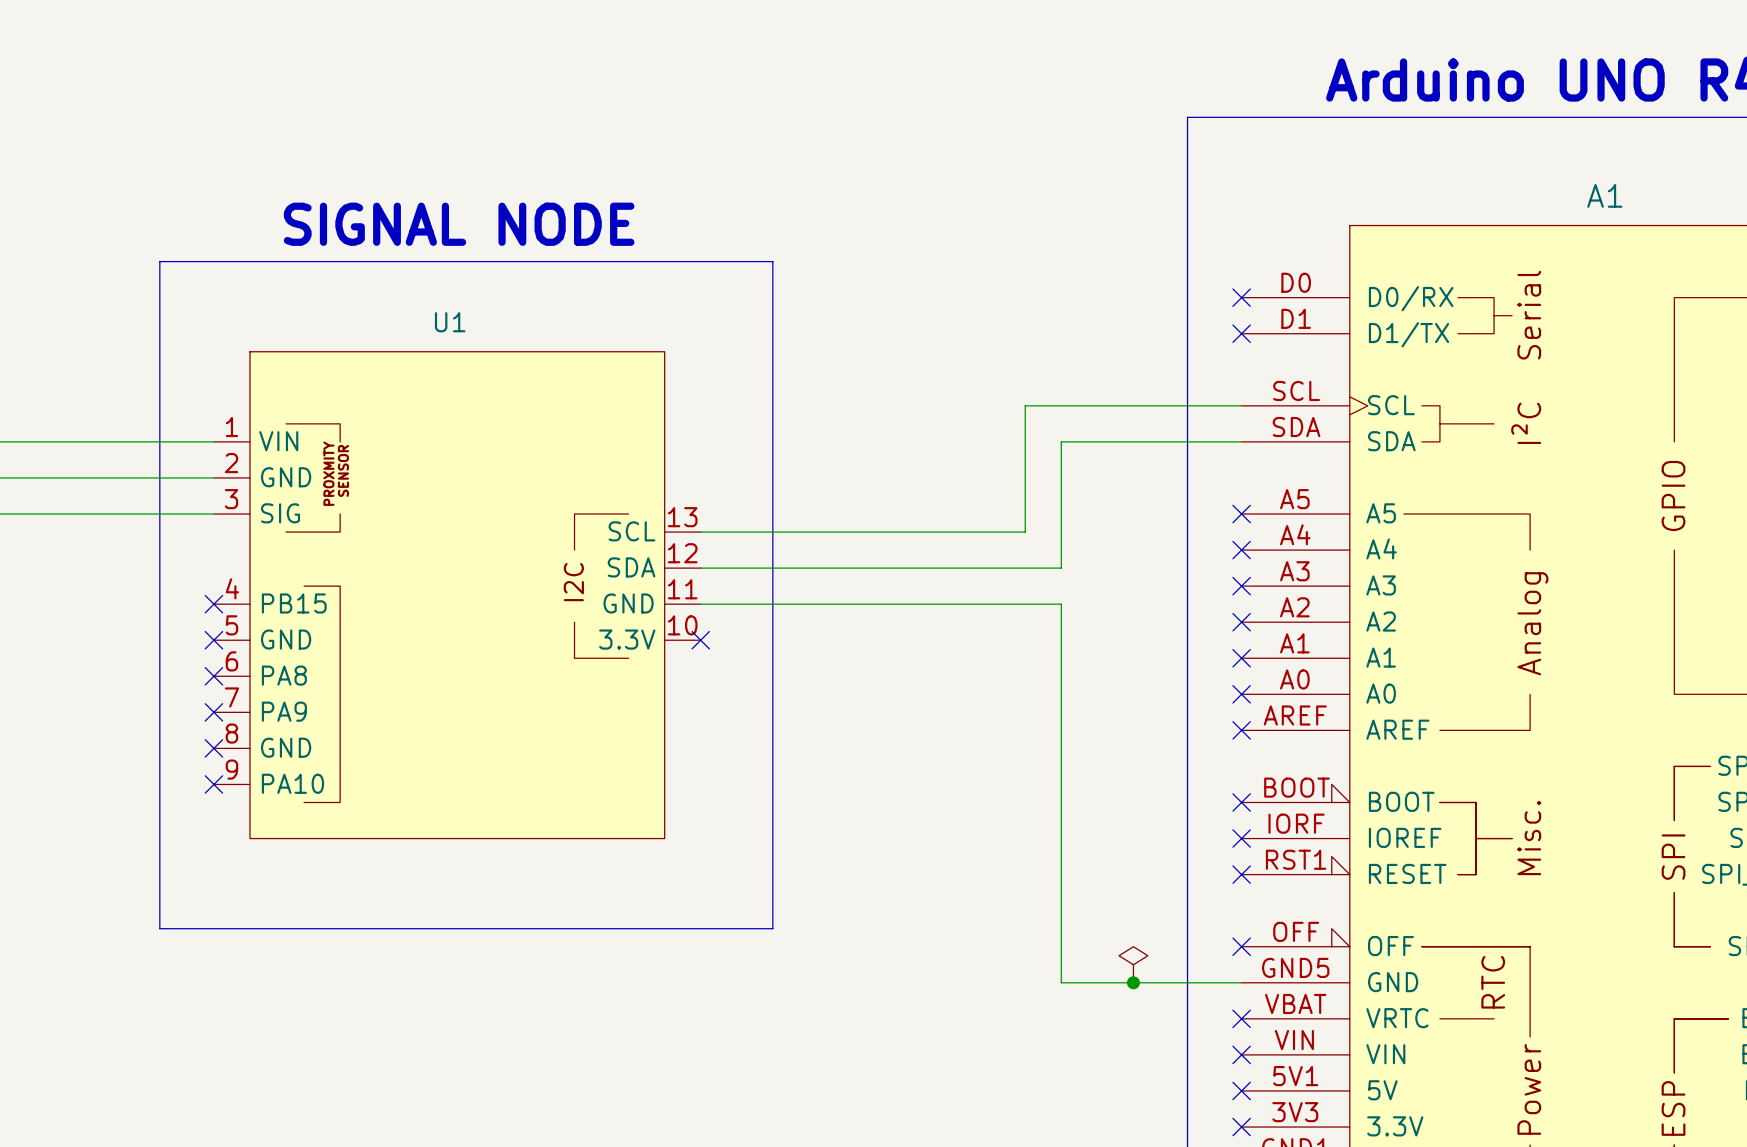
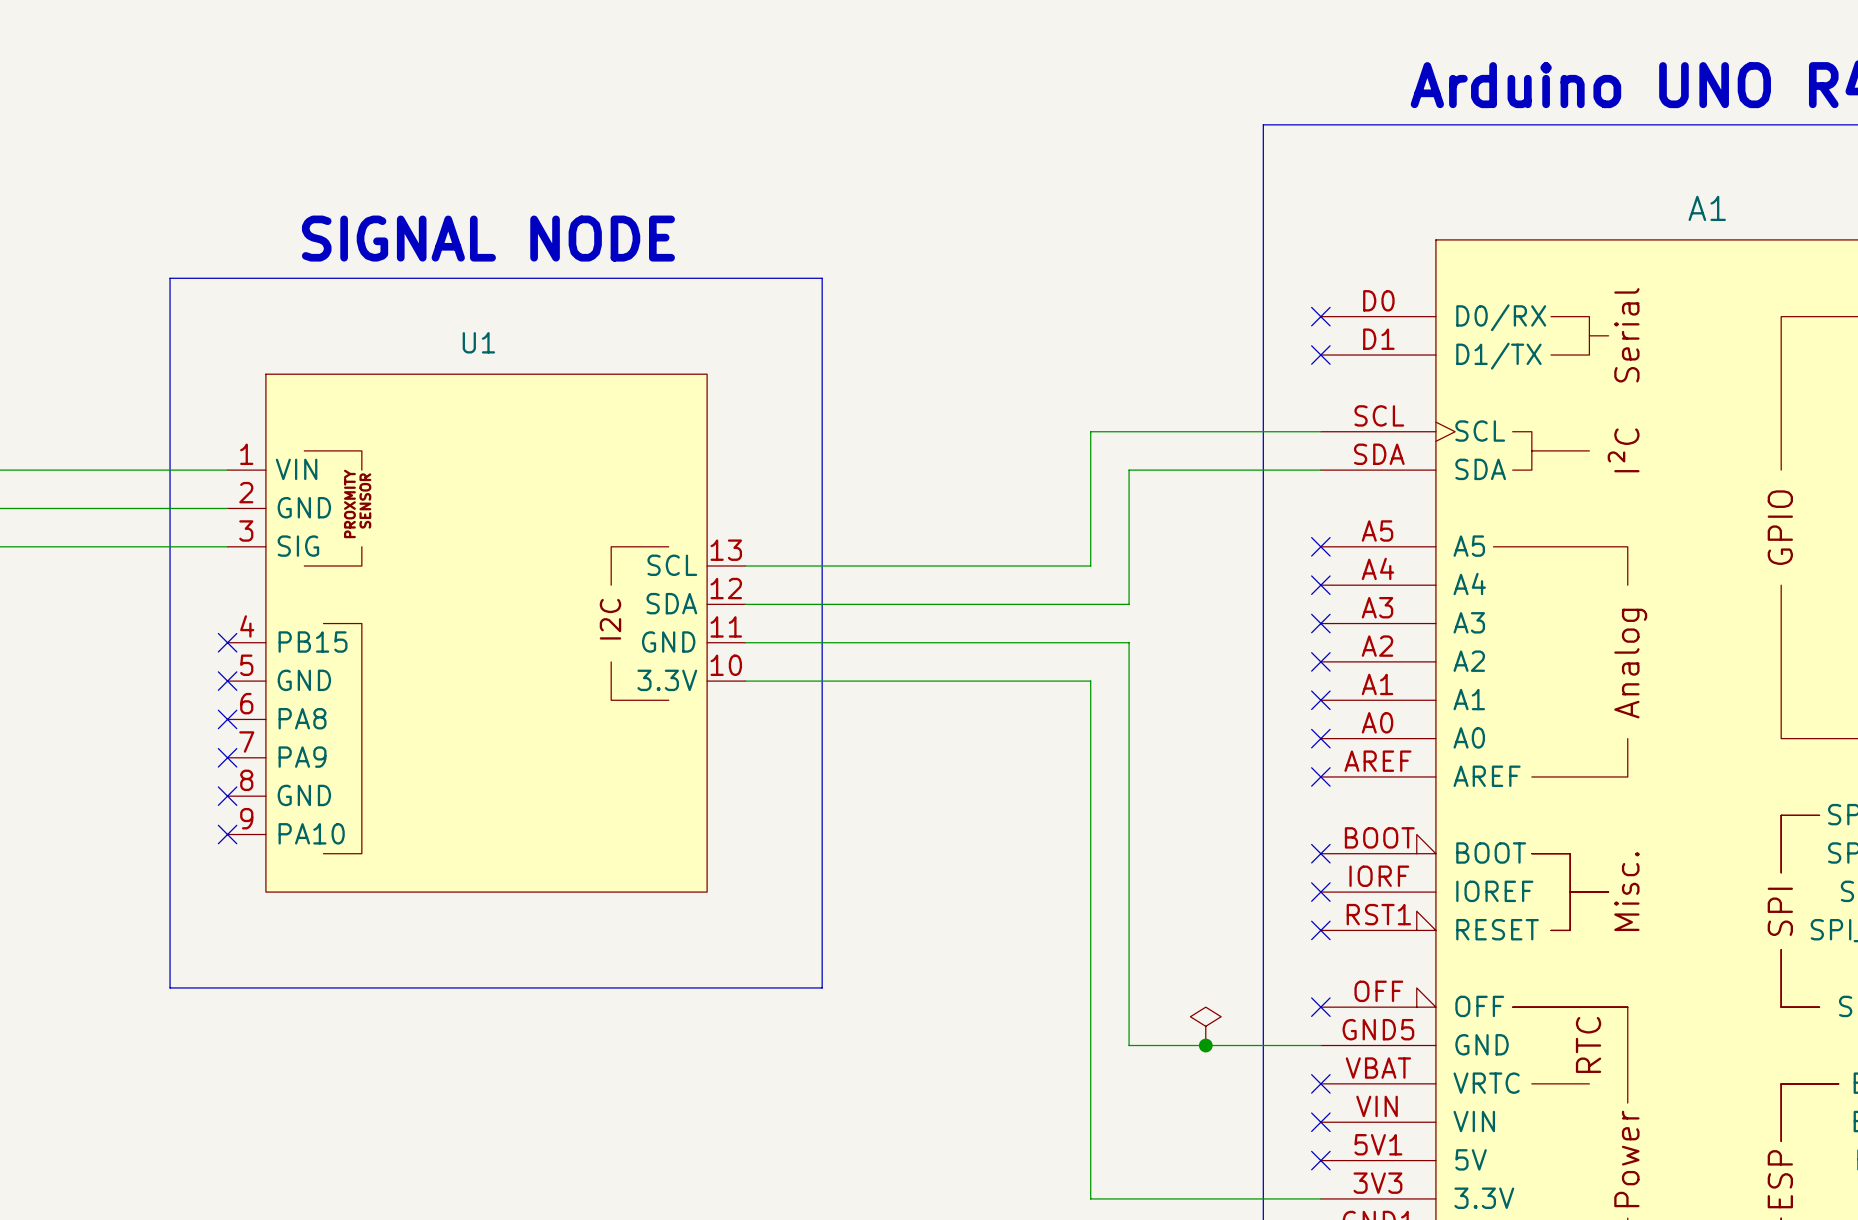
wire: none -> (745, 681) (1090, 681) (1090, 1198) (1320, 1198)
no-connect mark: (700, 640) -> none
no-connect mark: (1241, 1127) -> none

